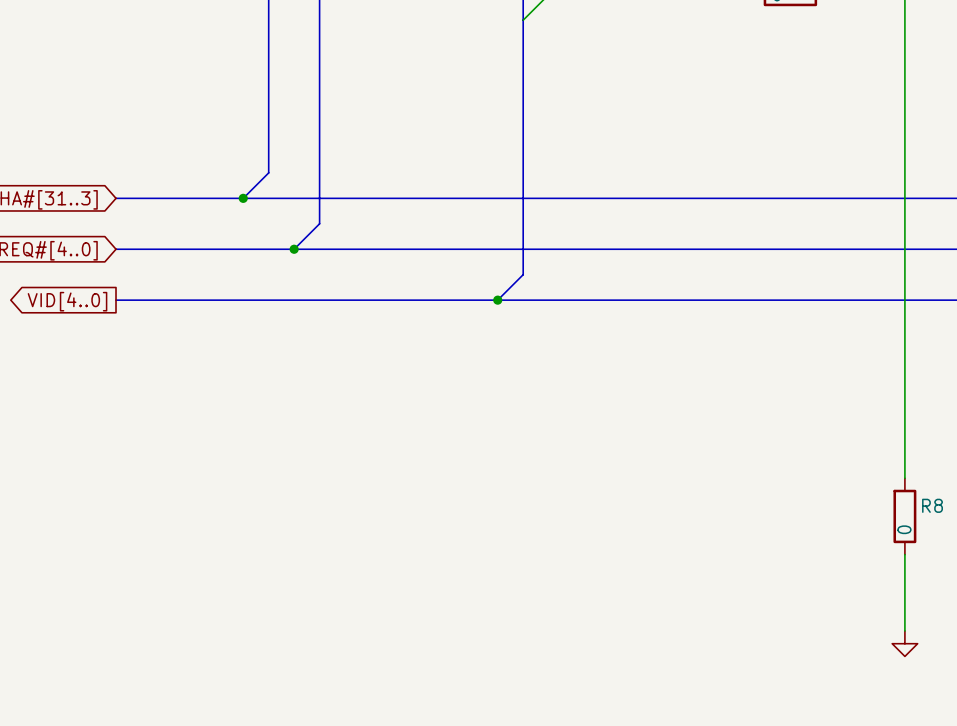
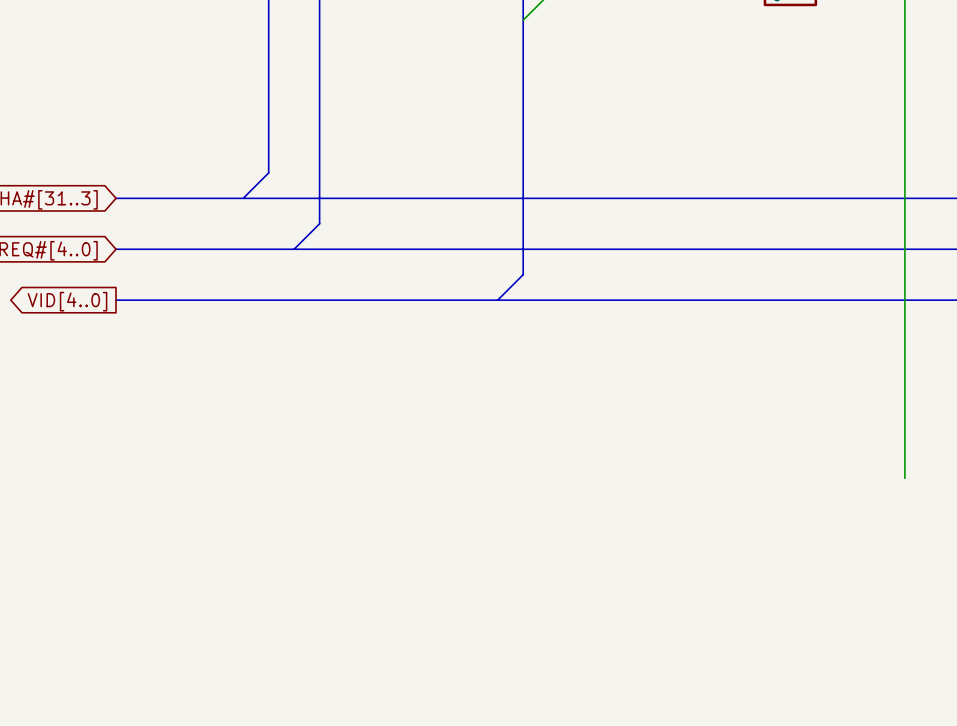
junction: (243, 198) -> none
junction: (294, 249) -> none
junction: (497, 300) -> none
R8: 0 (904, 516) -> none
wire: (904, 554) (904, 630) -> none
power symbol: (904, 643) -> none

